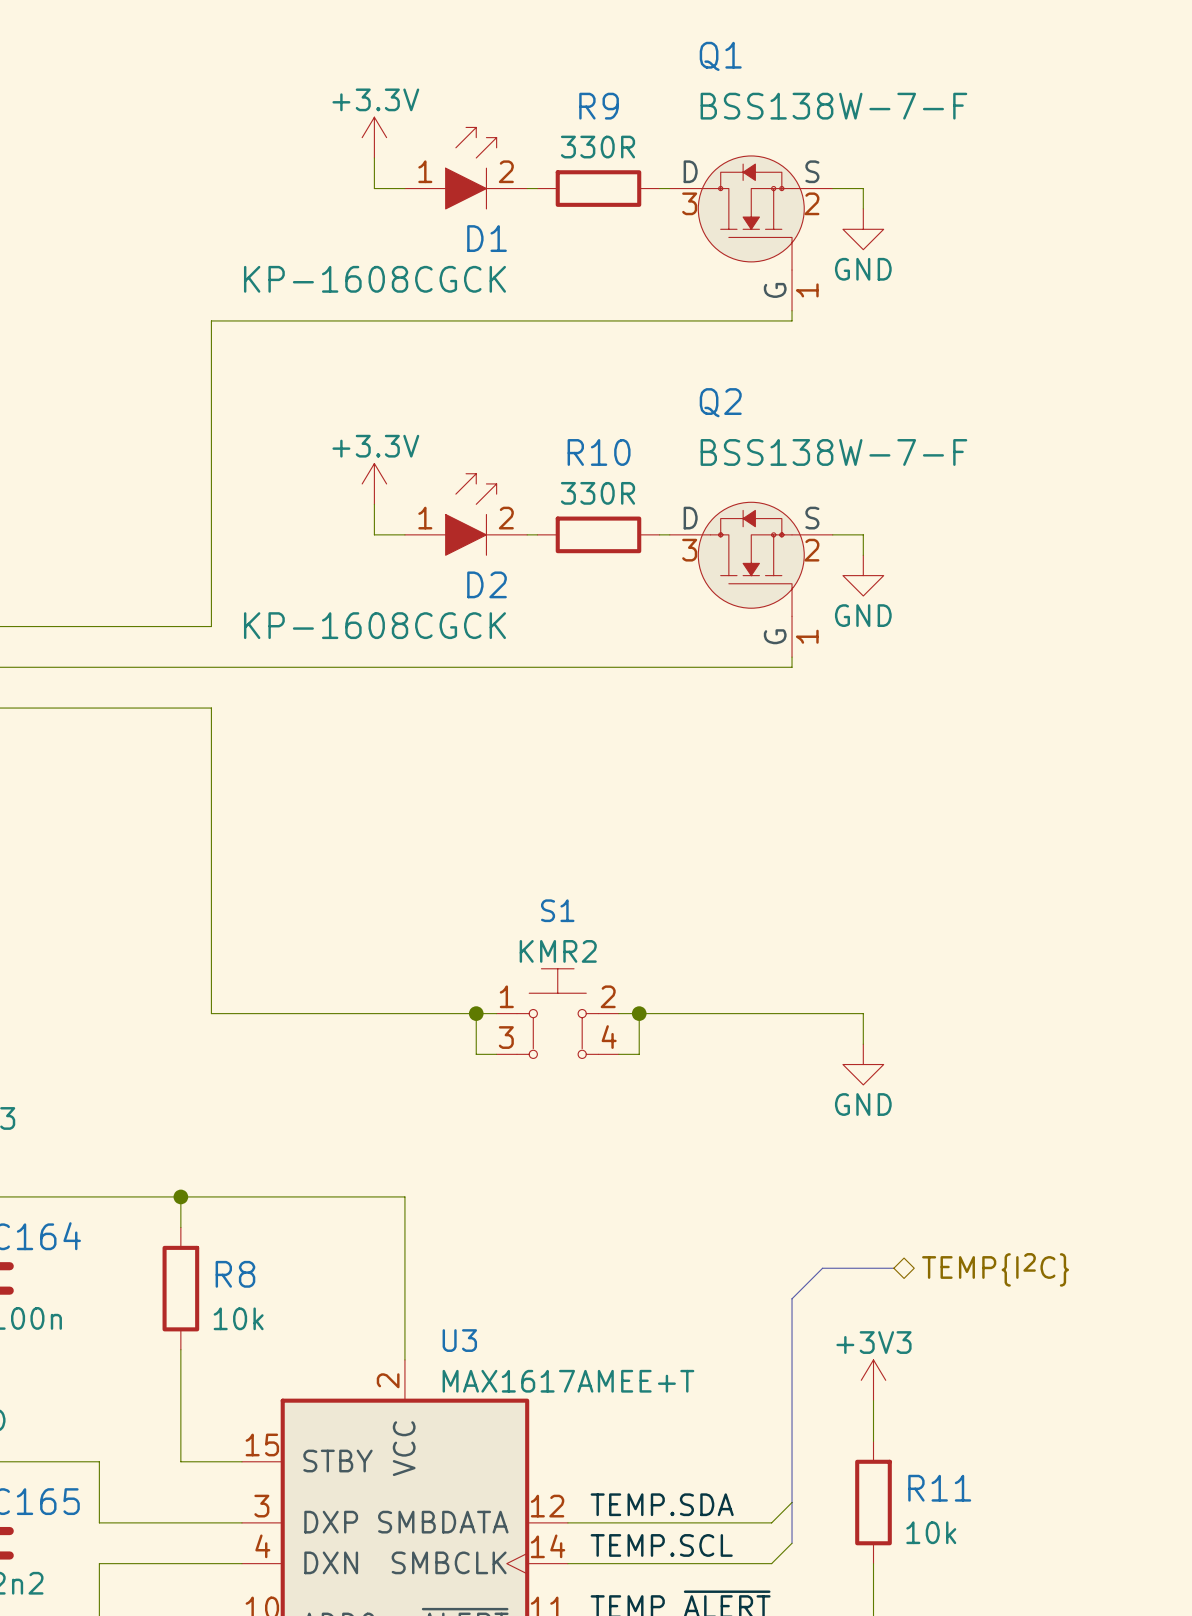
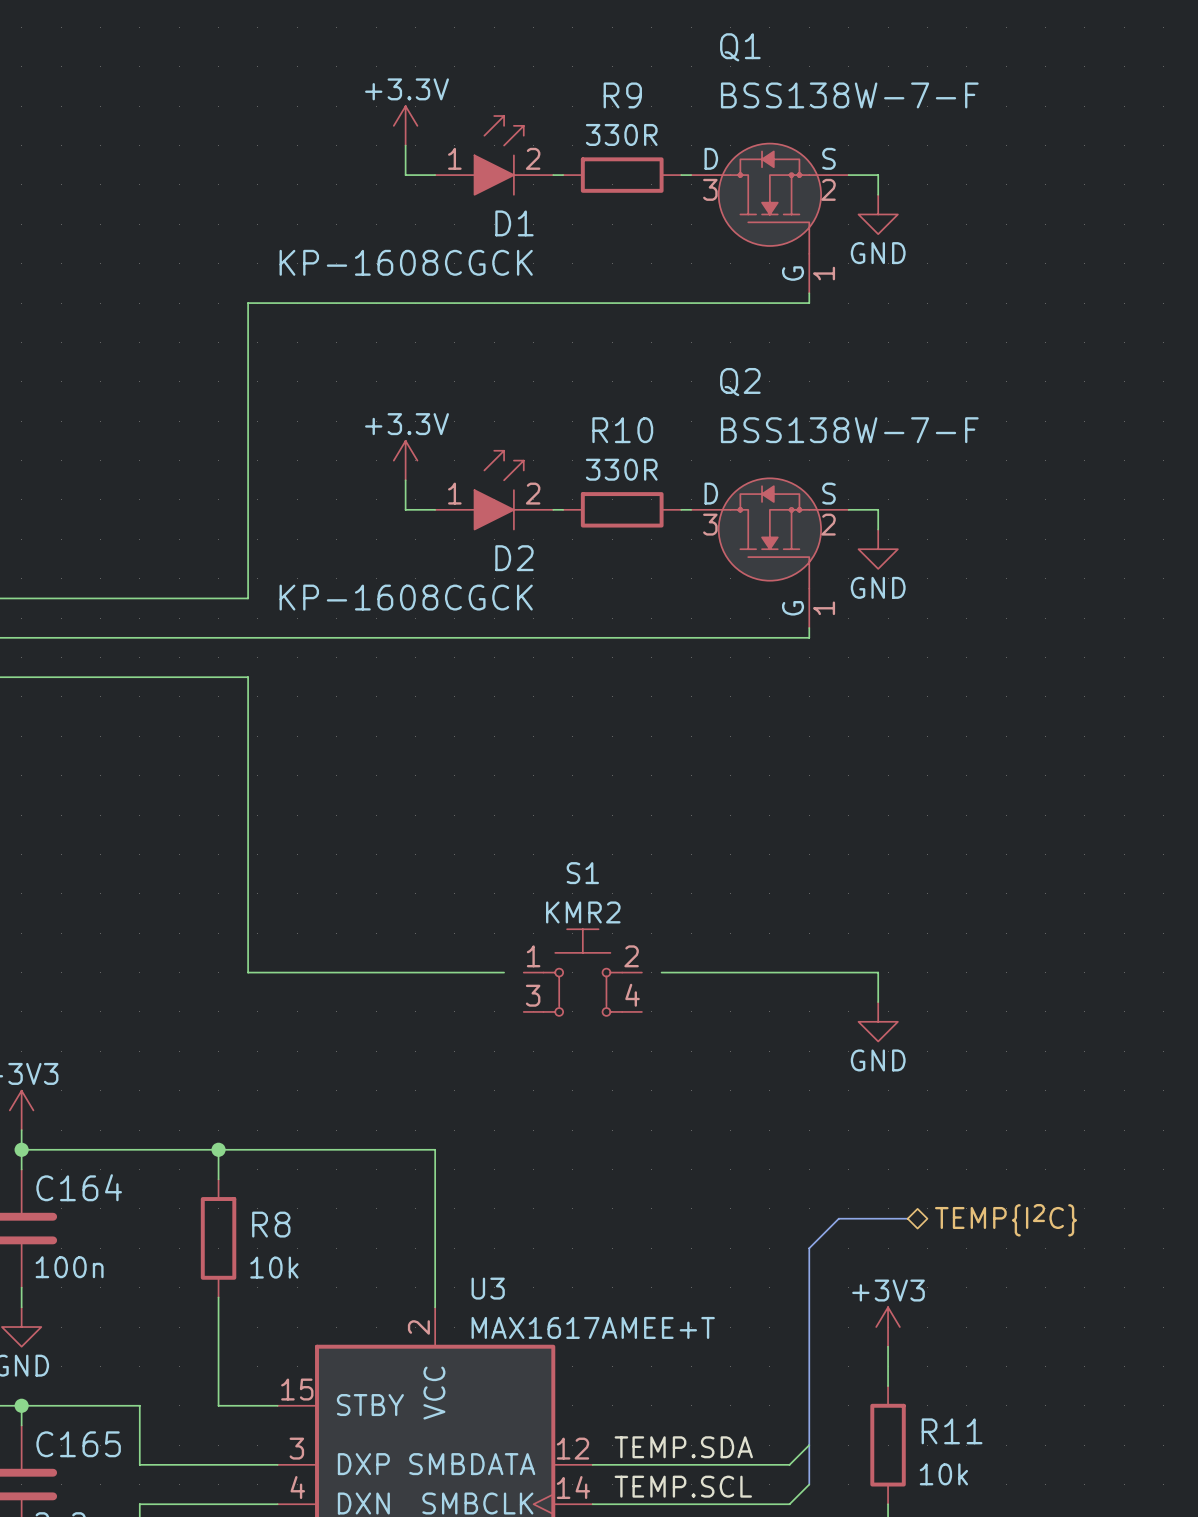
junction: (476, 1013) -> none
wire: (496, 1013) (476, 1013) (476, 1054) (496, 1054) -> none
wire: (618, 1013) (639, 1013) (639, 1054) (618, 1054) -> none
junction: (639, 1013) -> none

